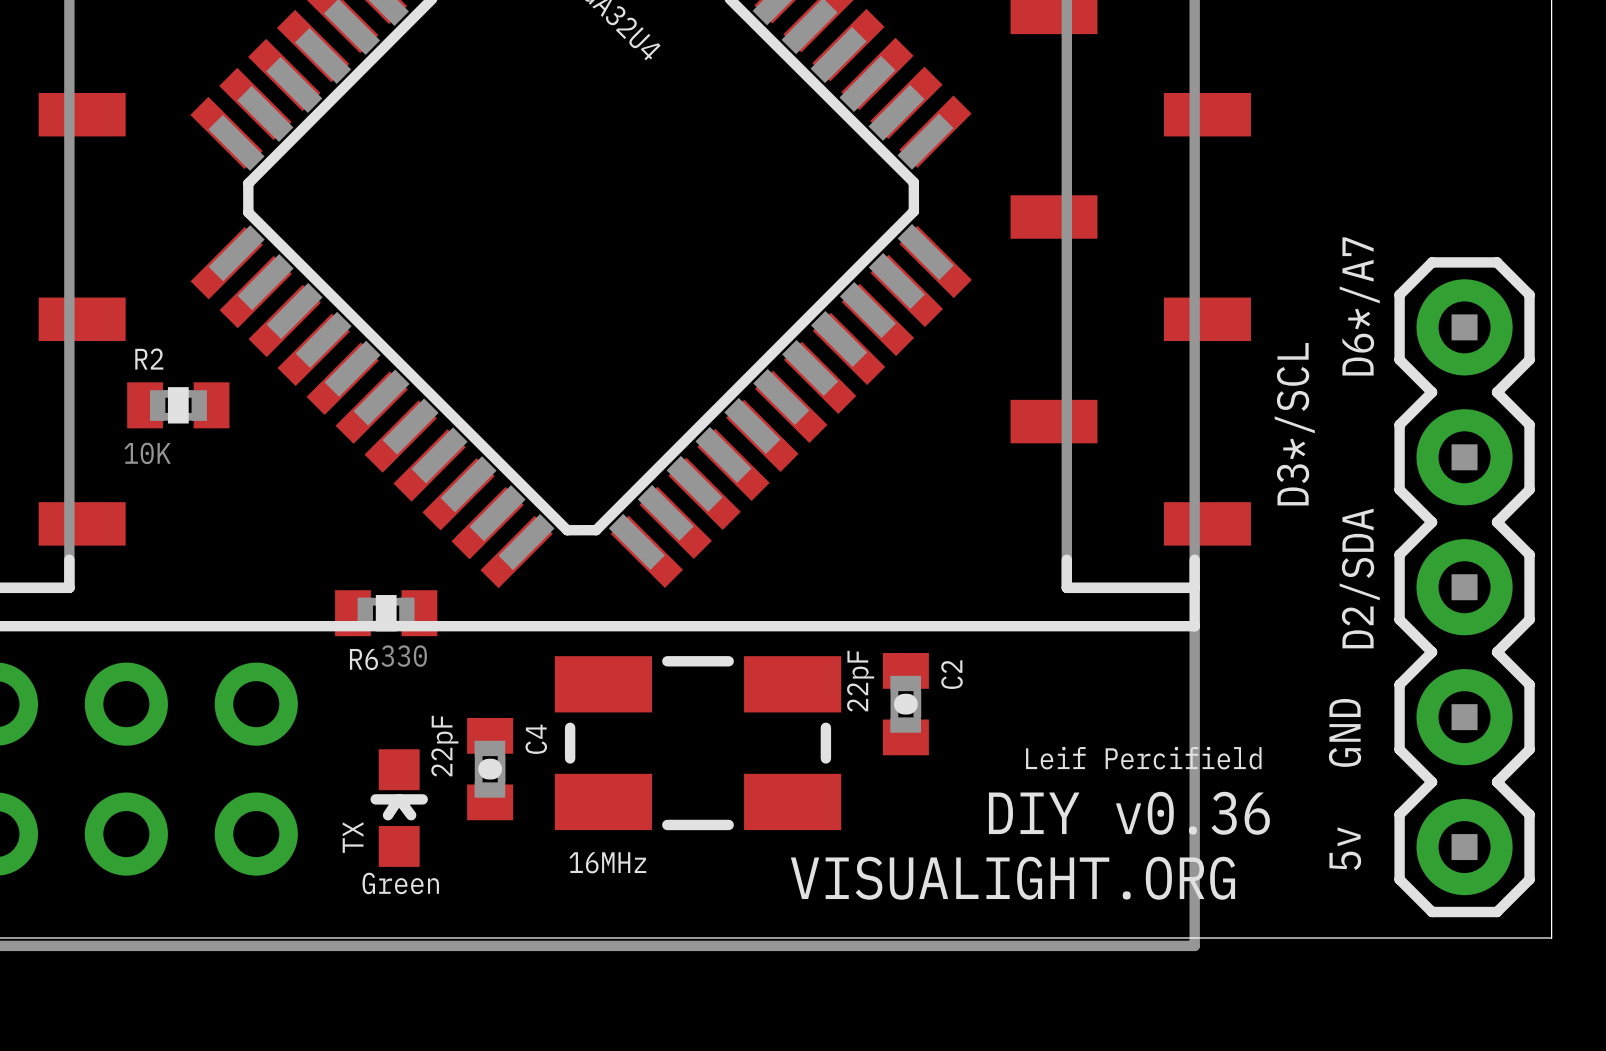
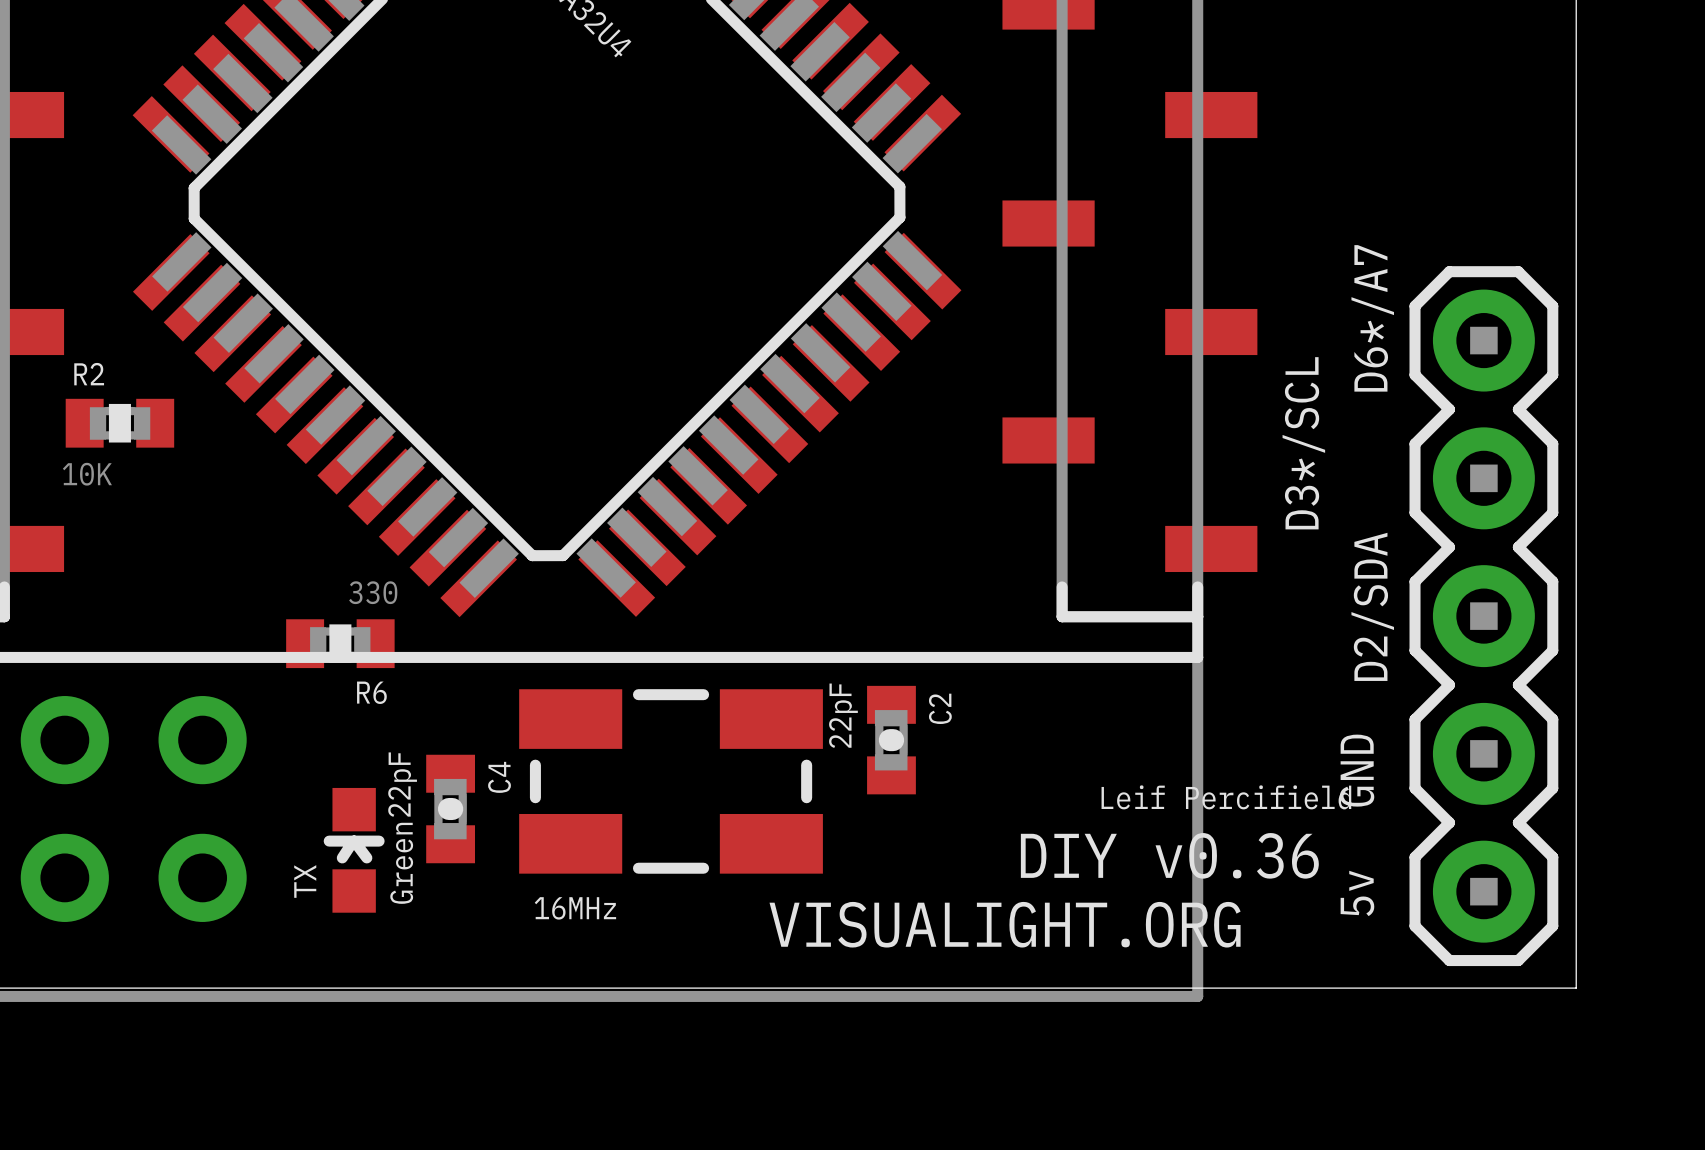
R6 value position: 330 (404, 656) -> 330 (373, 592)
R6 name position: R6 (363, 659) -> R6 (371, 692)
text position: Leif Percifield (1143, 758) -> Leif Percifield (1226, 797)
text position: DIY v0.36 (1129, 813) -> DIY v0.36 (1169, 855)
TX value rotation: 0° (400, 883) -> 90° counterclockwise (401, 863)

